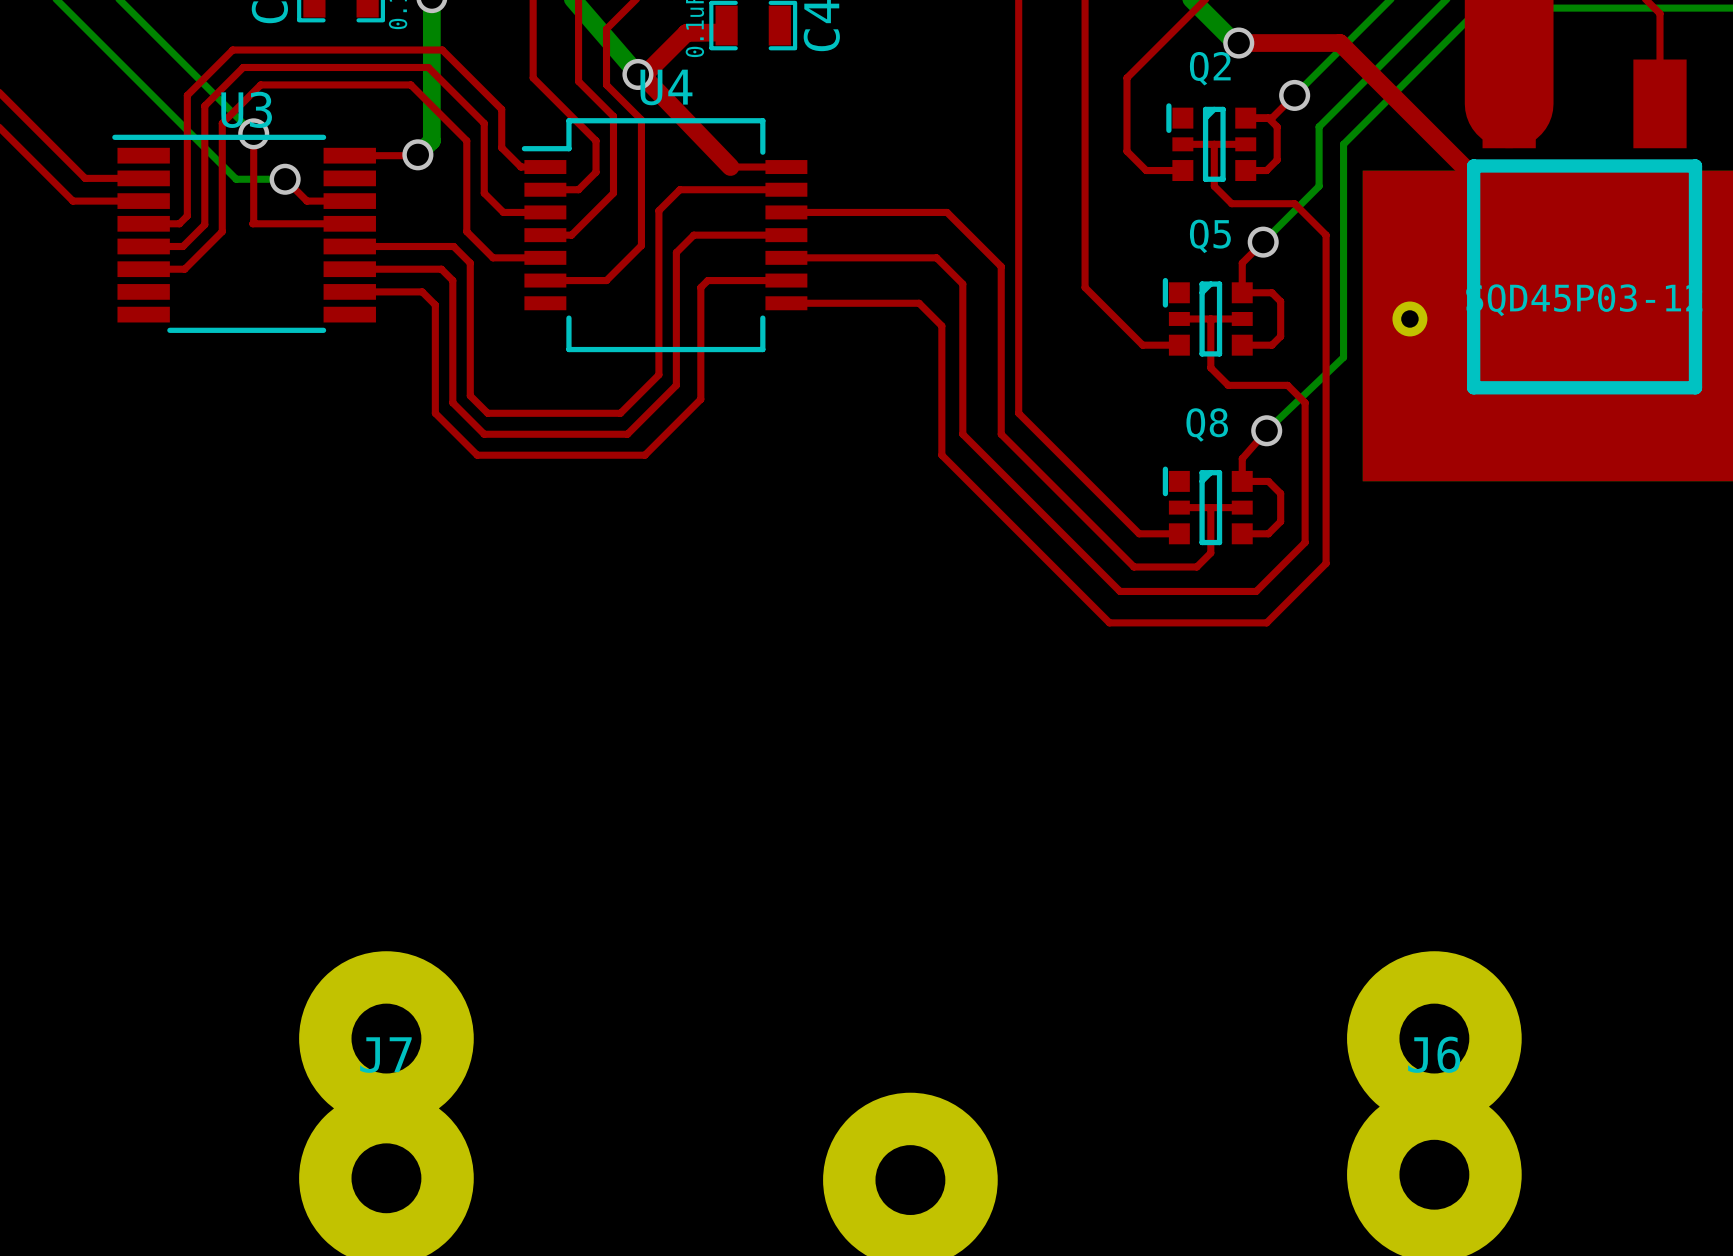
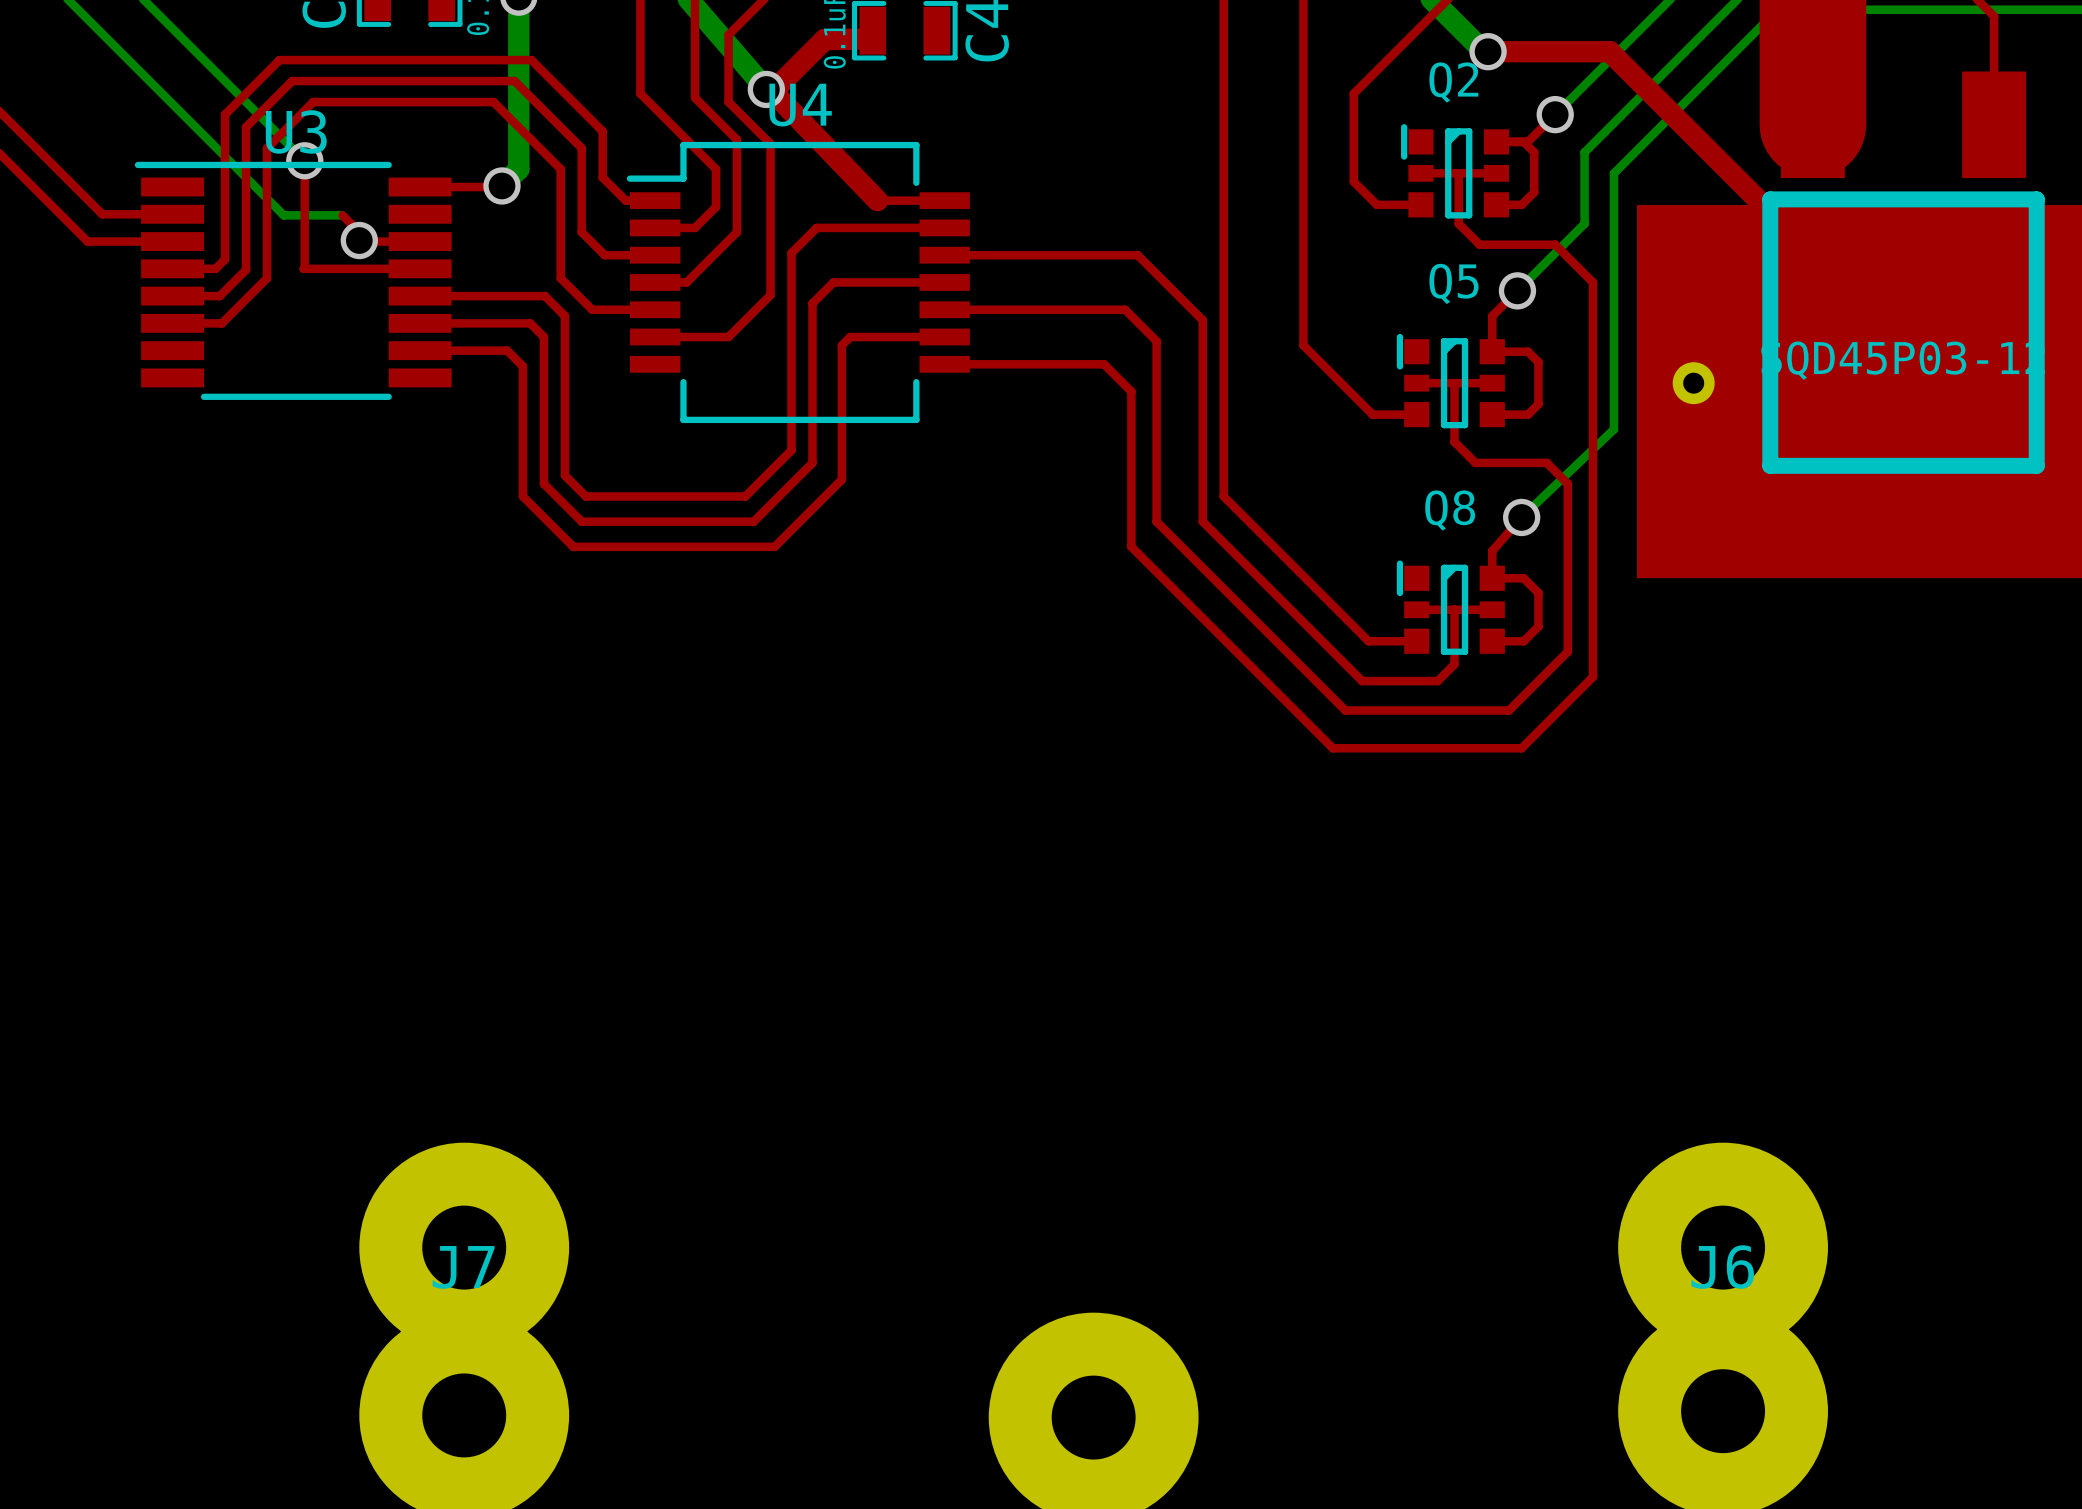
via position: (285, 179) -> (359, 240)

